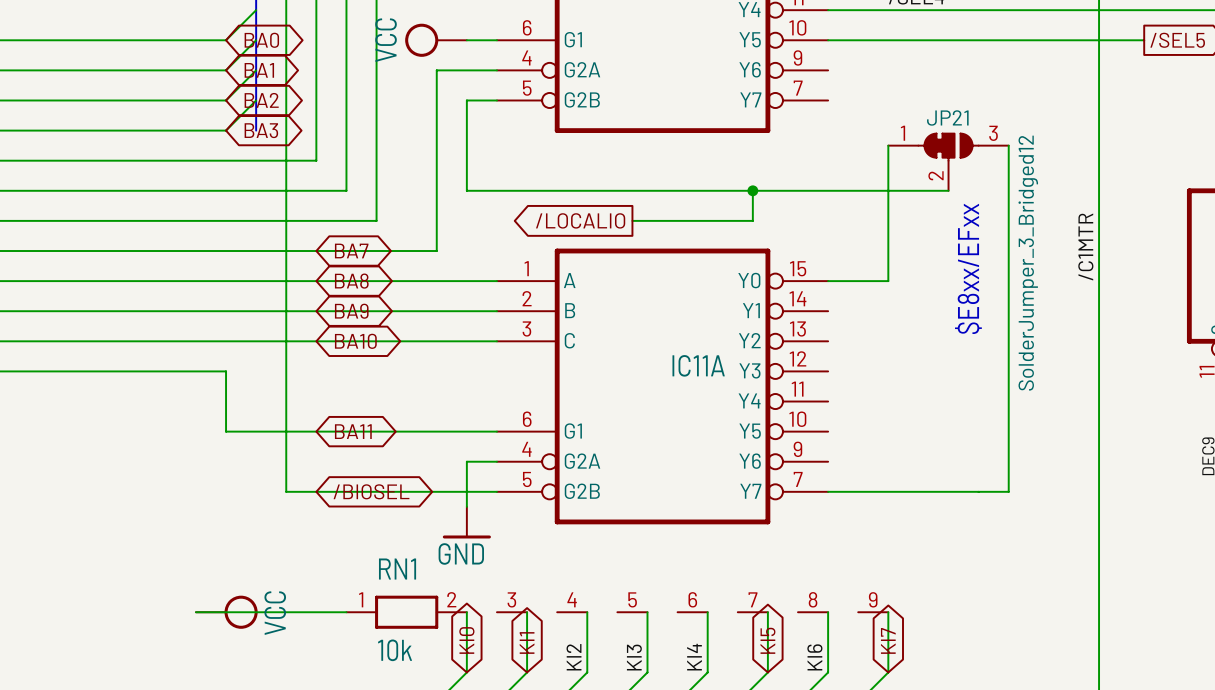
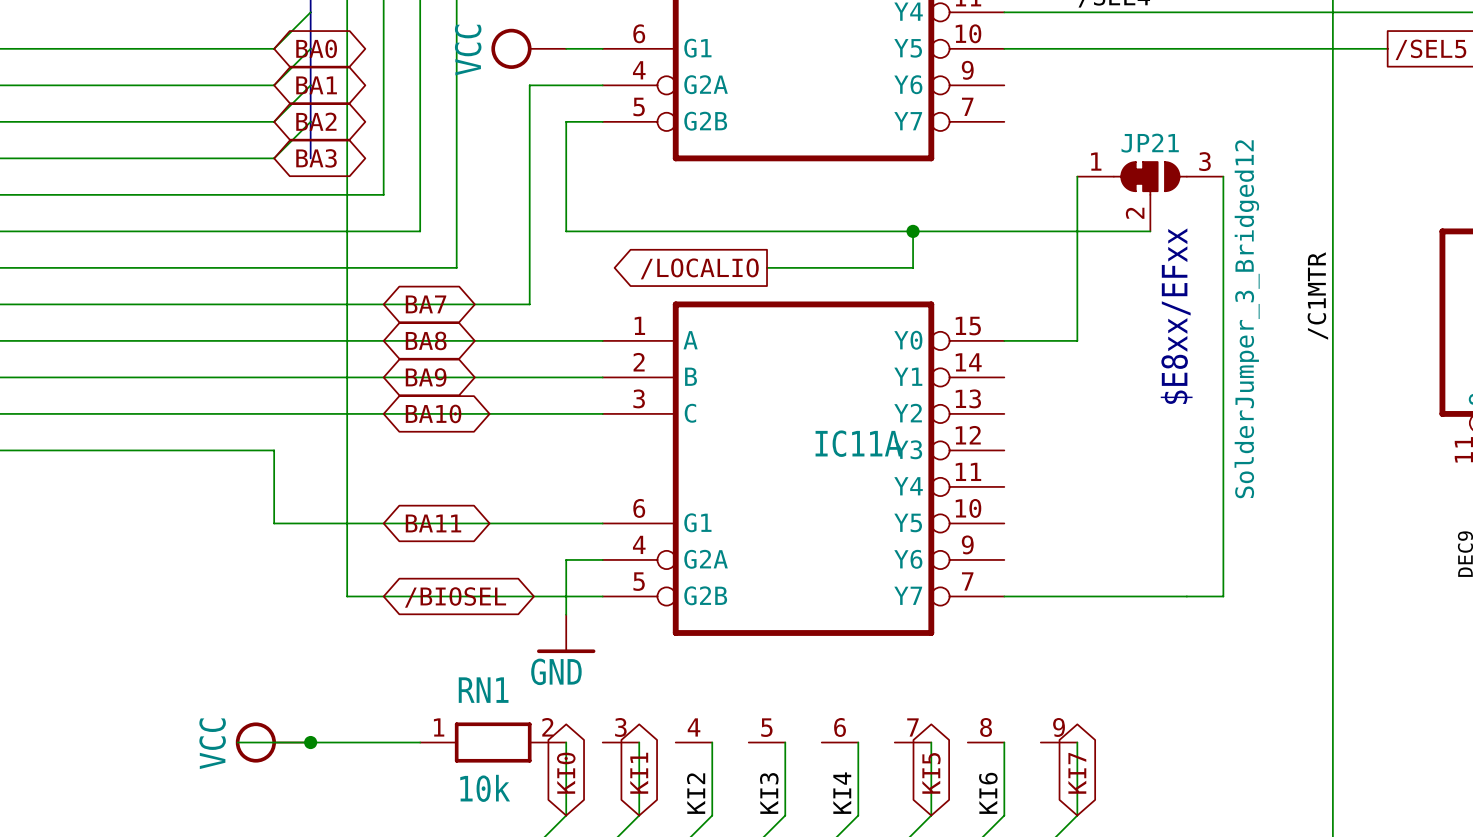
power symbol rotation: 0° (241, 612) -> 180° (255, 742)
junction: none -> (310, 742)

